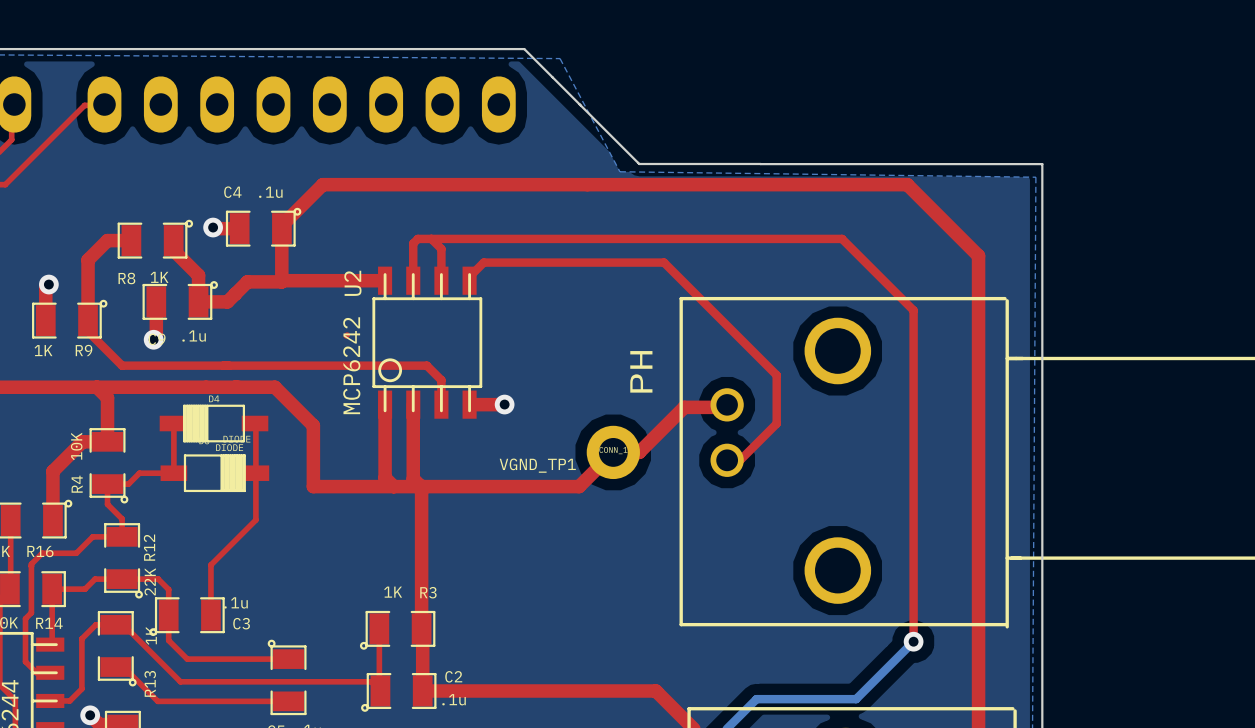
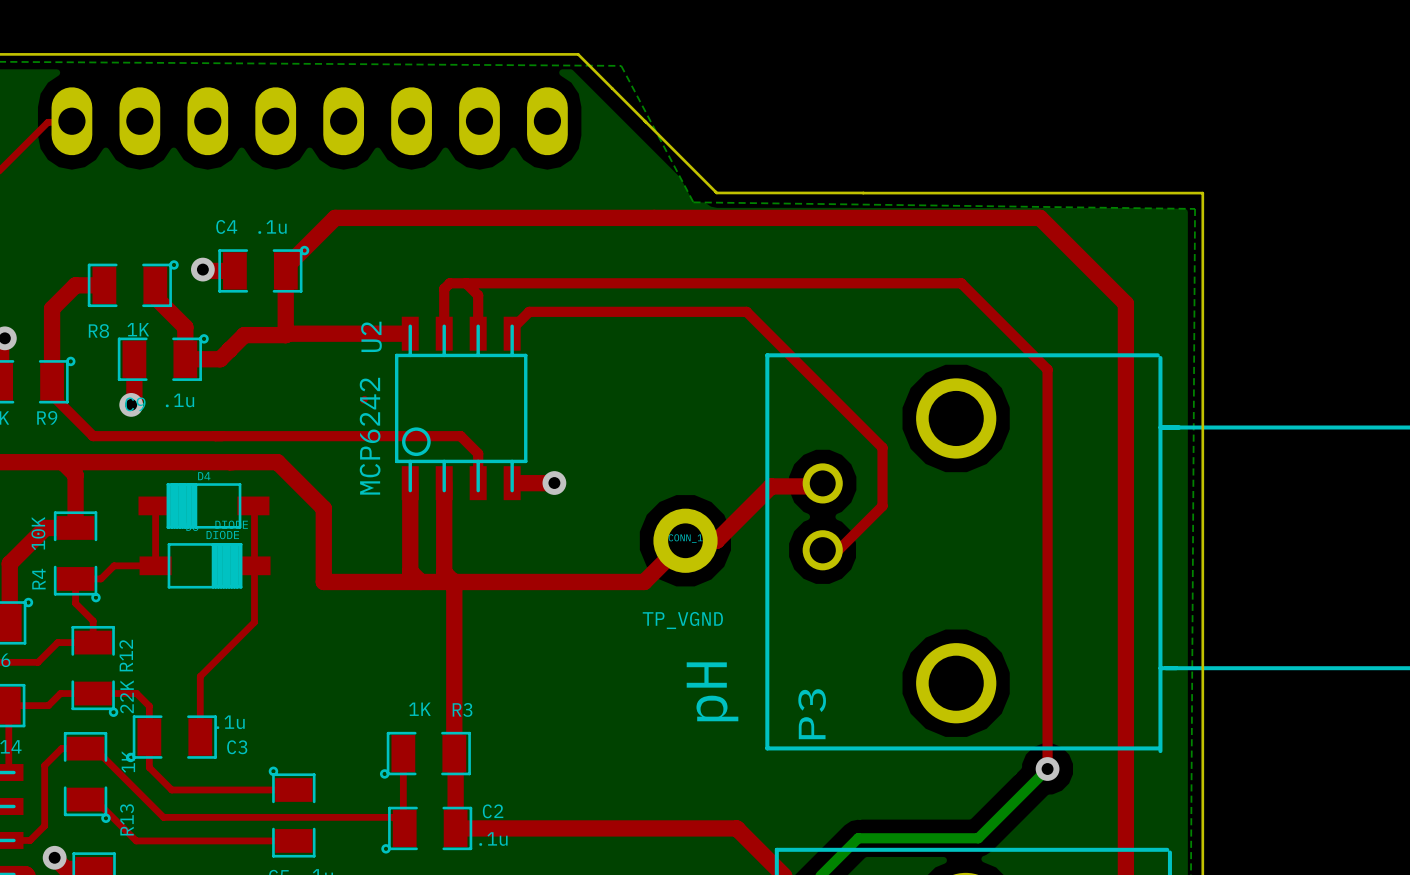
PH name: PH (641, 371) -> P3 (812, 714)
VGND_TP1 name: VGND_TP1 (537, 465) -> TP_VGND (682, 620)
text: none -> pH (712, 691)

